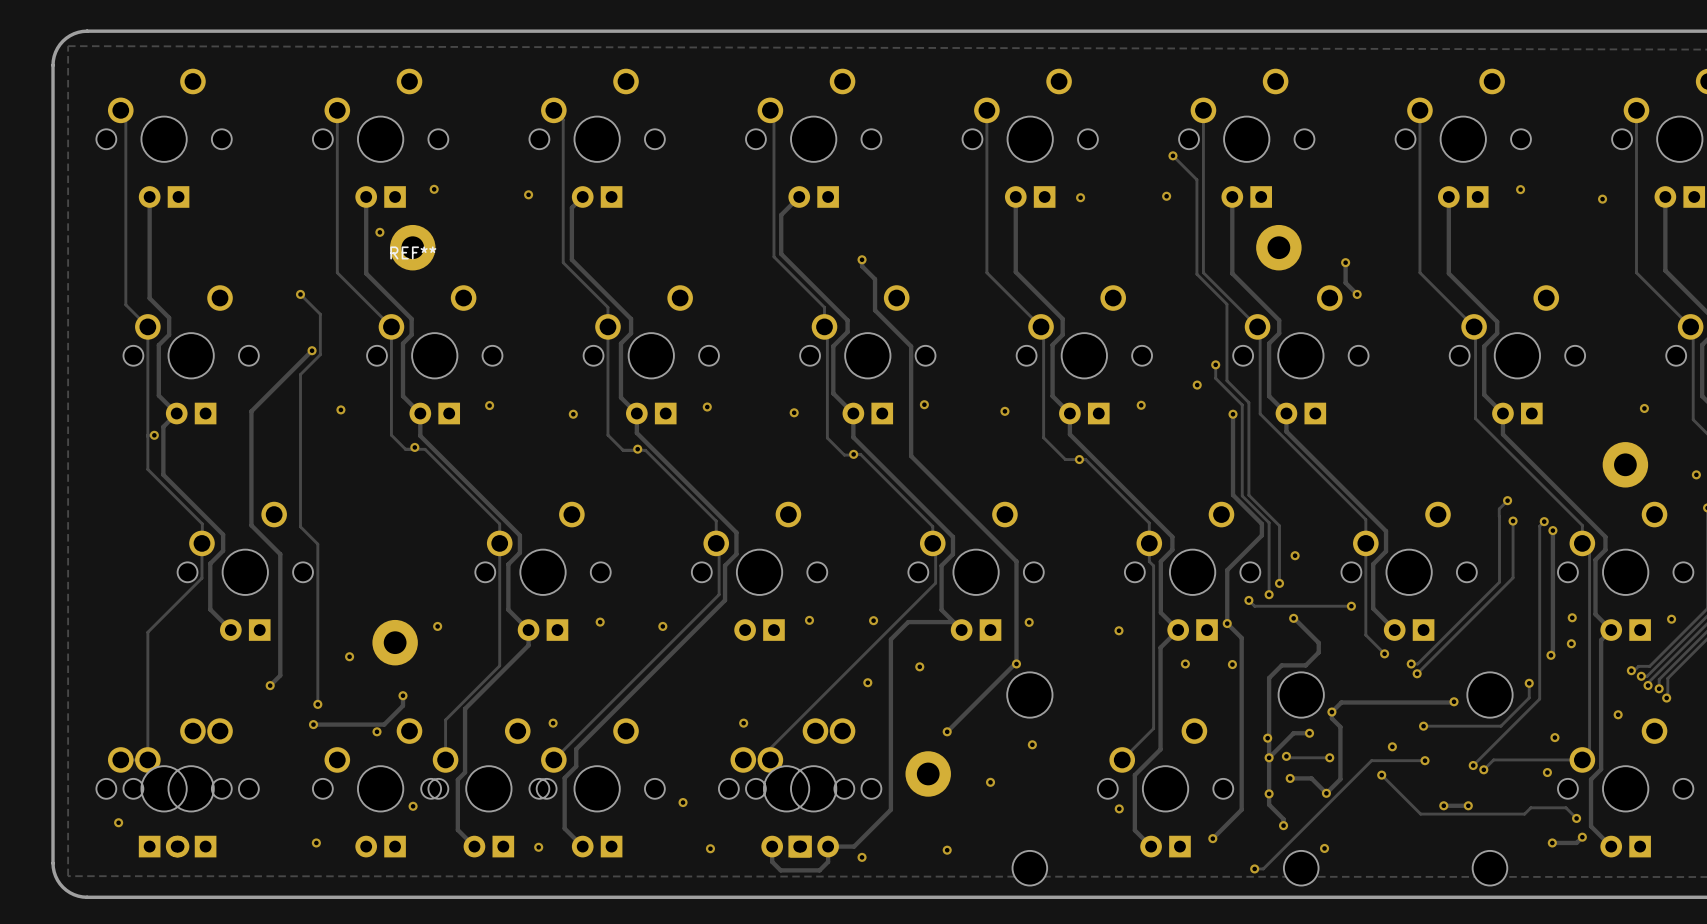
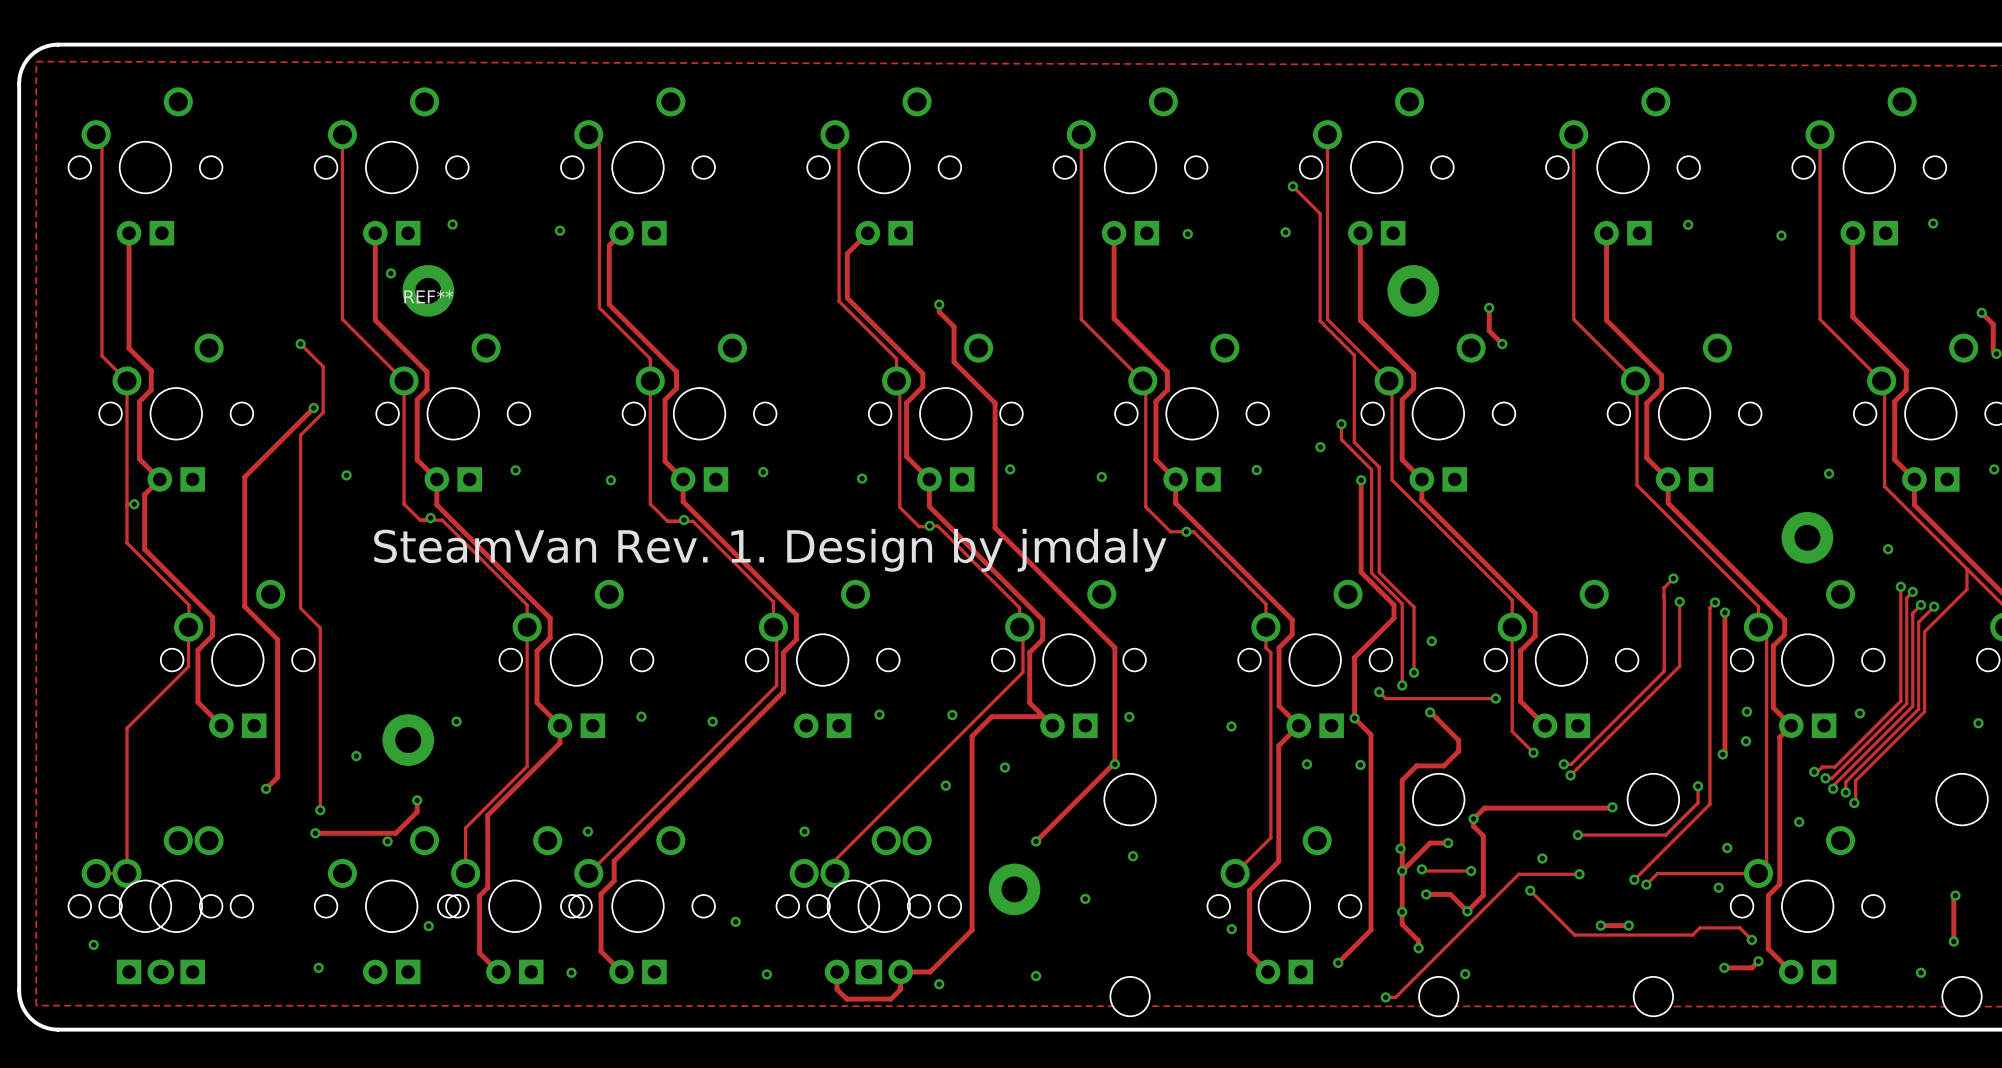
text: none -> SteamVan Rev. 1. Design by jmdaly (770, 550)

